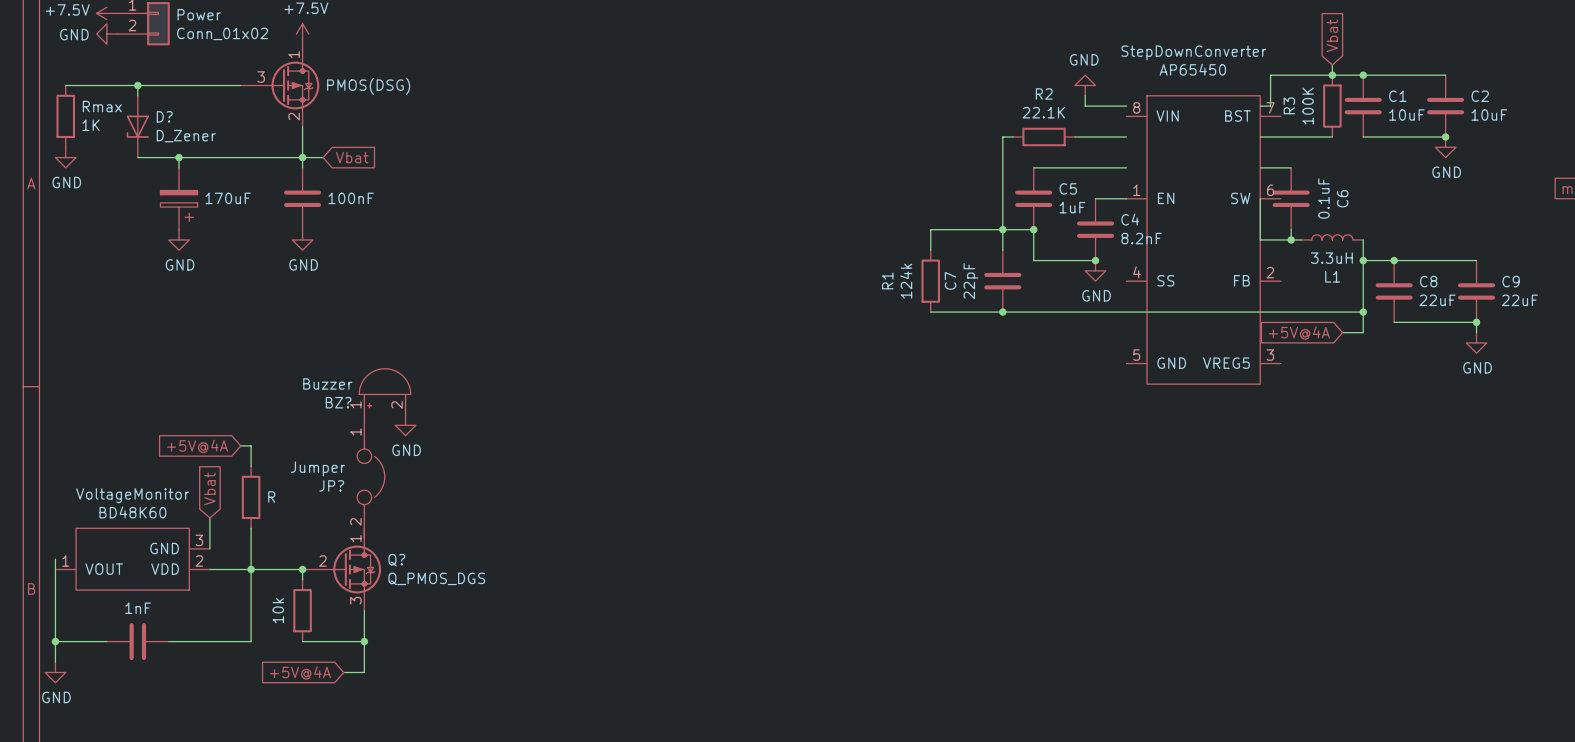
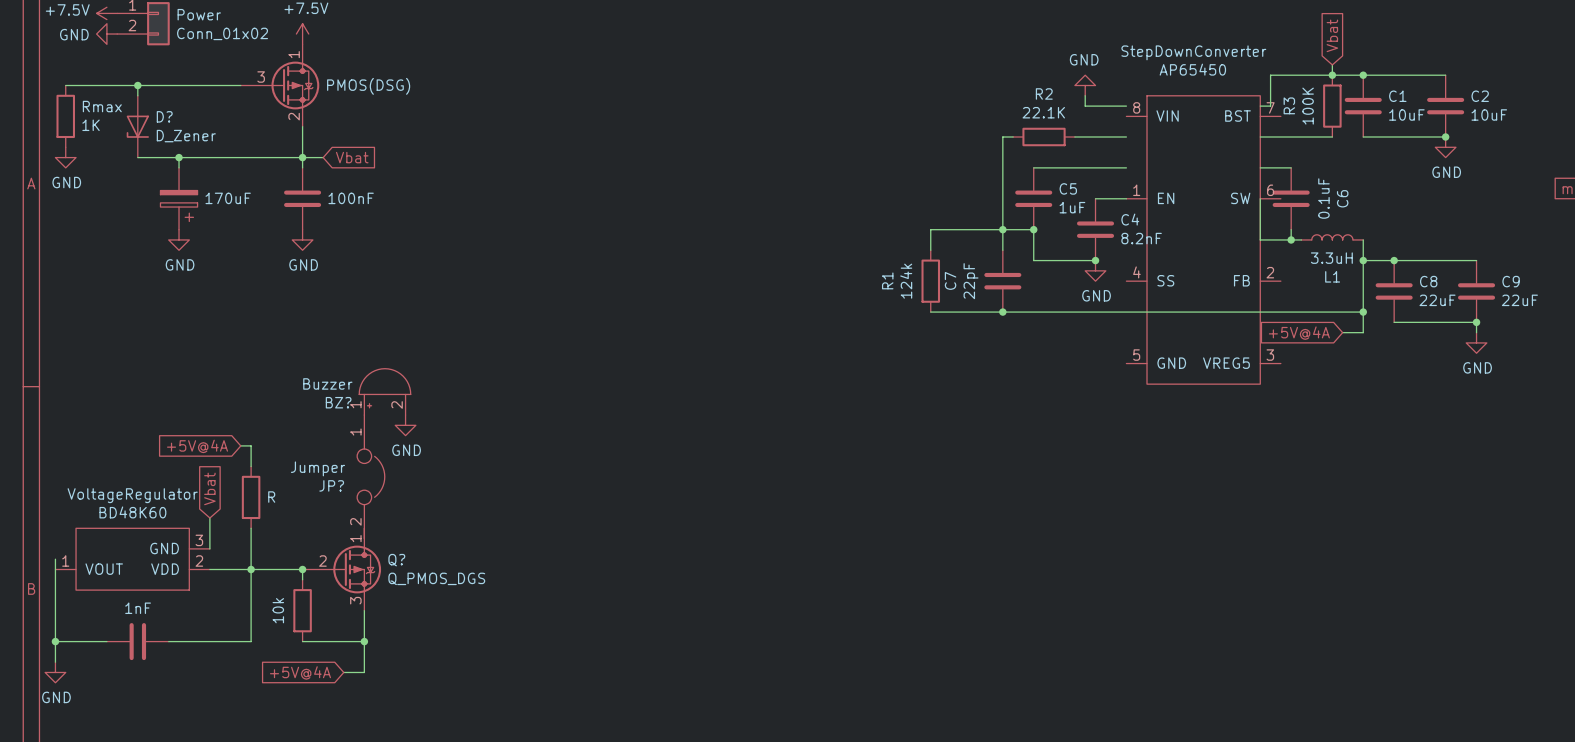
VoltageMonitor name: VoltageMonitor (132, 495) -> VoltageRegulator (132, 495)

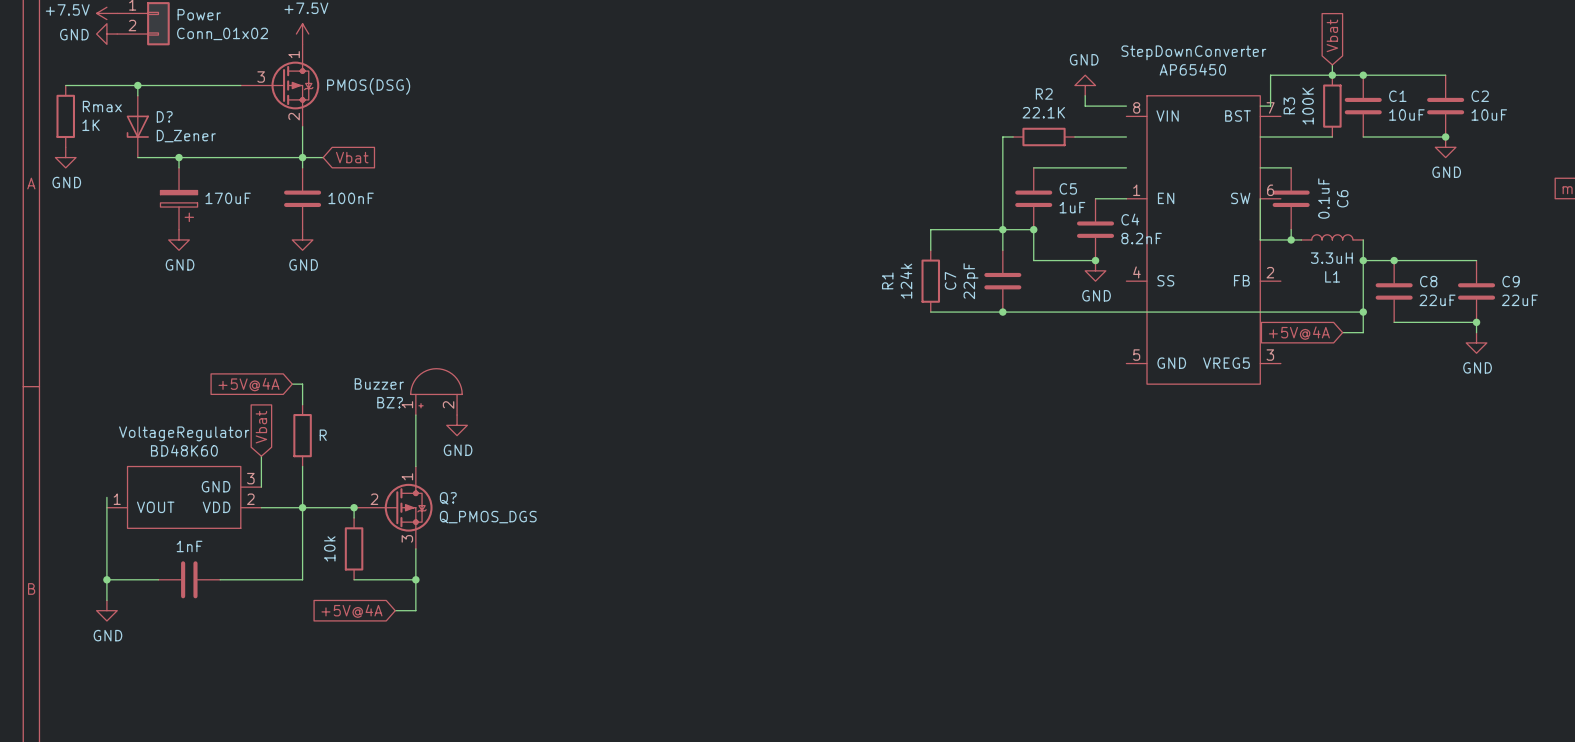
BZ? position: (384, 391) -> (436, 391)
wire: none -> (415, 415) (415, 466)
power symbol position: GND (405, 425) -> GND (457, 425)
wire: (240, 445) (251, 445) (251, 466) -> (292, 384) (302, 384) (302, 404)
global label position: +5V@4A (197, 446) -> +5V@4A (248, 384)
JP?: Jumper (370, 476) -> none
global label position: Vbat (209, 488) -> Vbat (261, 427)
part position: (251, 497) -> (302, 435)
wire: none -> (261, 507) (354, 507) (354, 518)
junction: none -> (302, 507)
junction: none -> (354, 507)
wire: (209, 518) (209, 548) -> (261, 456) (261, 487)
wire: (251, 528) (251, 641) (168, 641) -> none
wire: (55, 559) (55, 662) -> (106, 497) (106, 600)
VoltageRegulator position: (132, 559) -> (184, 497)
wire: (209, 569) (302, 569) -> (302, 466) (302, 569)
junction: (251, 569) -> none
junction: (302, 569) -> none
Q? position: (341, 569) -> (393, 507)
junction: none -> (106, 579)
wire: none -> (220, 579) (302, 579)
junction: none -> (415, 579)
part position: (302, 610) -> (354, 548)
wire: (364, 610) (364, 672) (343, 672) -> (415, 548) (415, 610) (395, 610)
wire: (55, 641) (106, 641) -> (106, 579) (158, 579)
junction: (55, 641) -> none
part position: (137, 641) -> (189, 579)
wire: (302, 641) (364, 641) -> (354, 579) (415, 579)
junction: (364, 641) -> none
power symbol position: GND (55, 672) -> GND (106, 610)
global label position: +5V@4A (300, 672) -> +5V@4A (351, 611)

